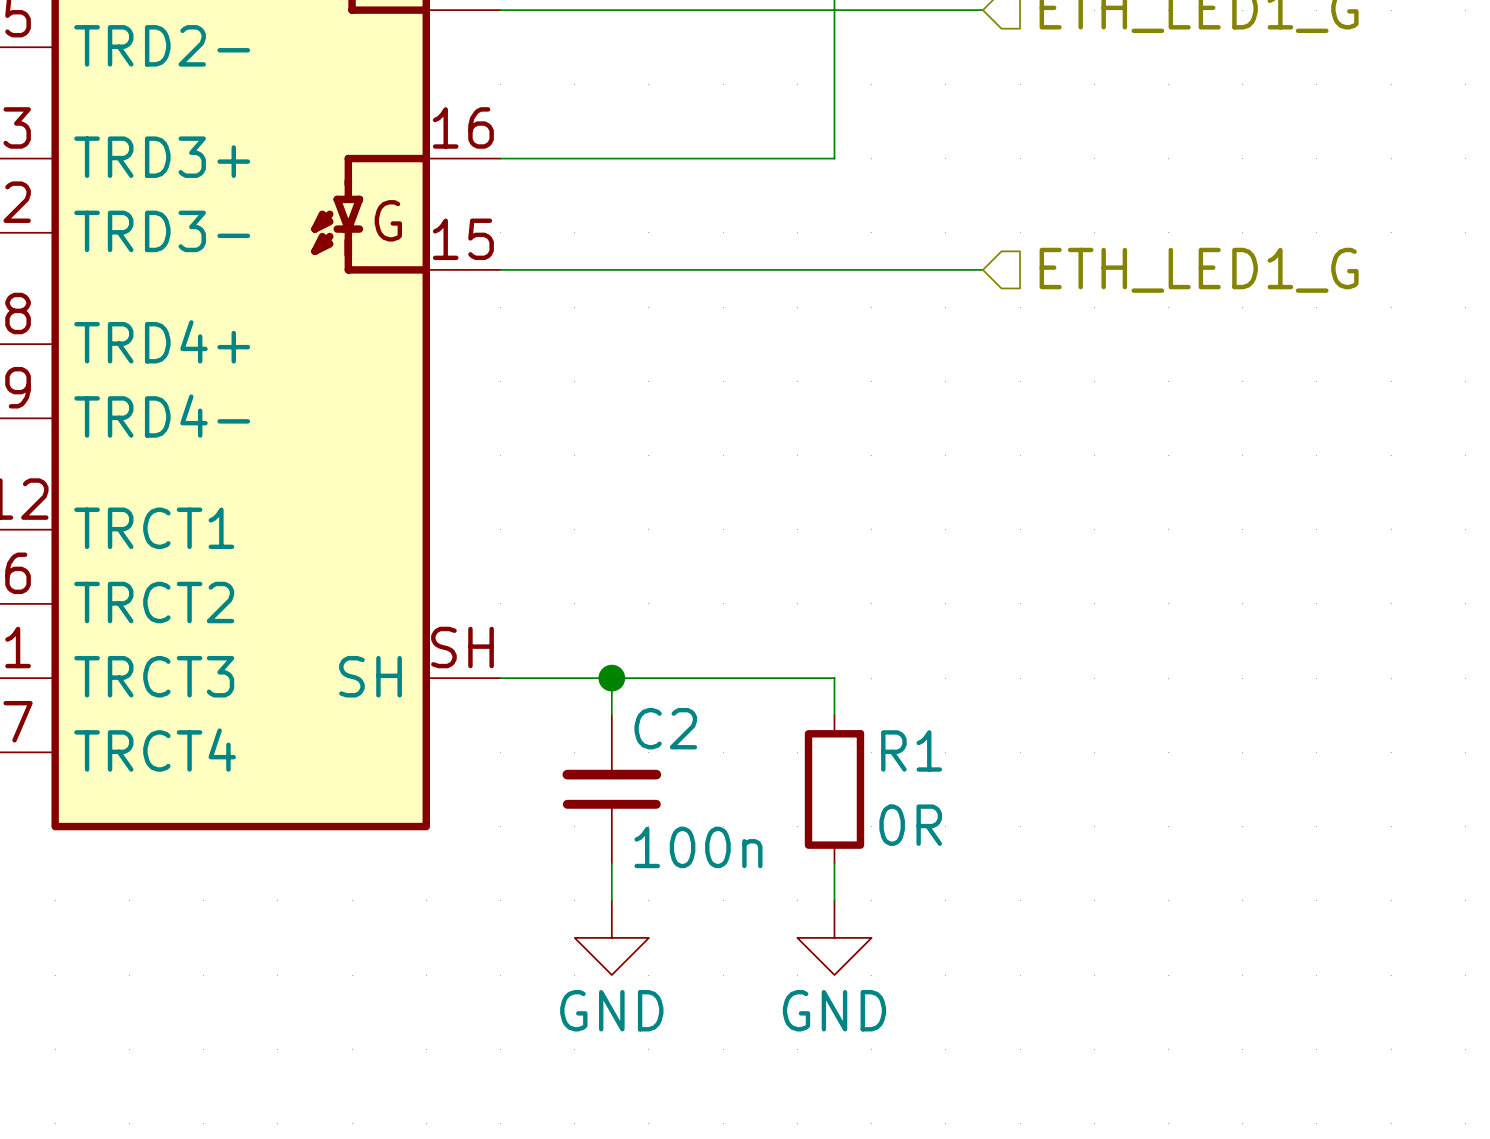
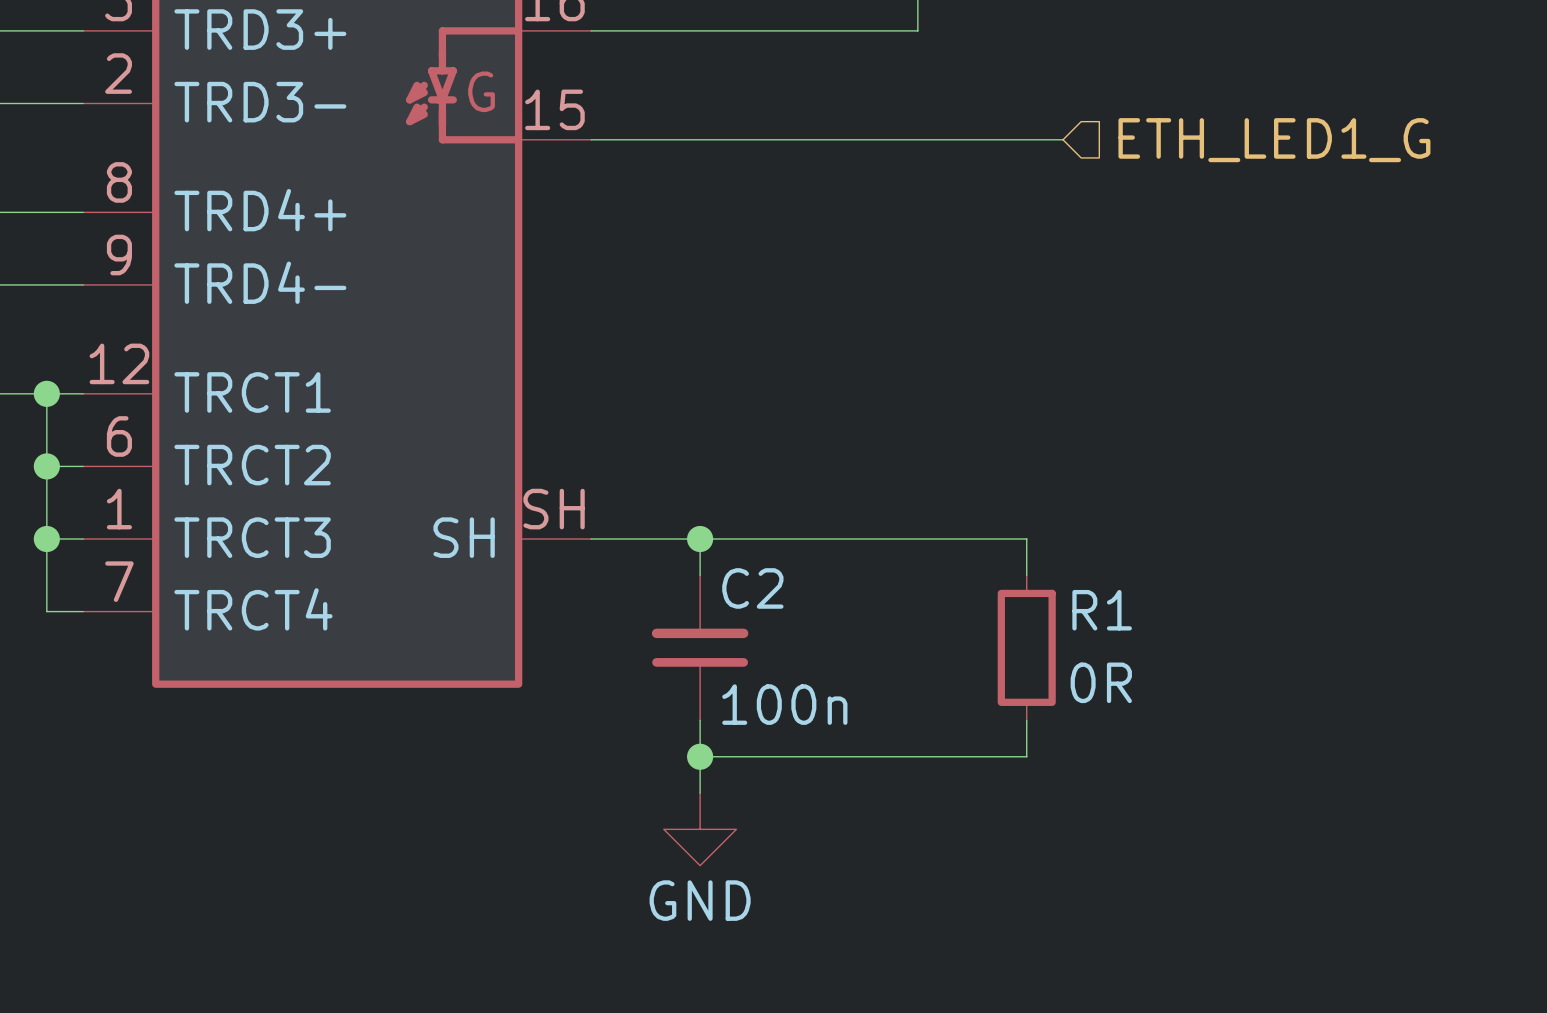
wire: (834, 678) (834, 715) -> (917, 539) (1026, 539) (1026, 575)
R1 position: (834, 789) -> (1026, 647)
wire: (834, 863) (834, 900) -> none
wire: none -> (1026, 720) (1026, 756) (700, 756) (700, 793)
junction: none -> (700, 756)
power symbol position: GND (611, 937) -> GND (700, 829)
power symbol: GND (834, 937) -> none

